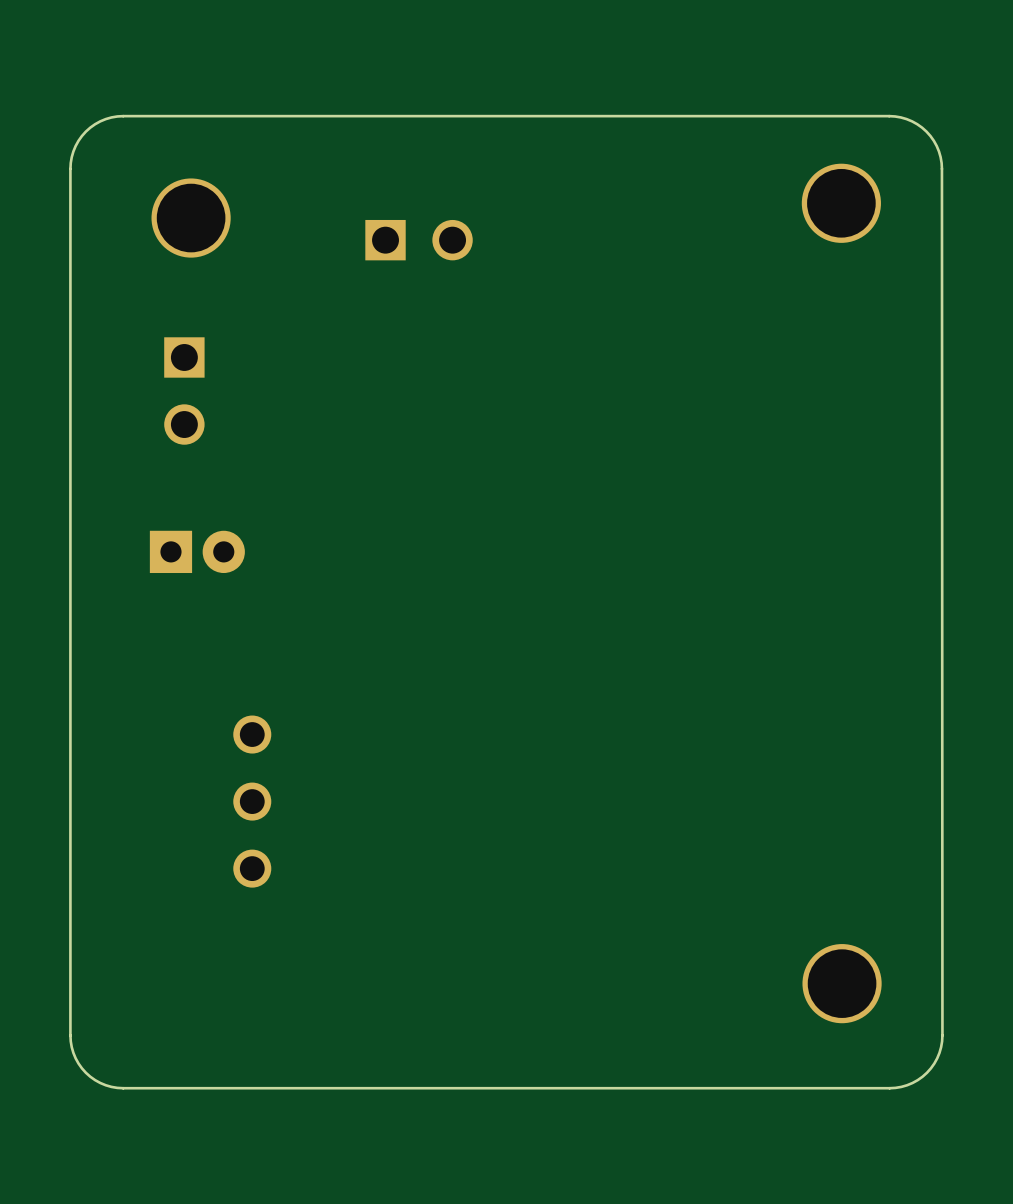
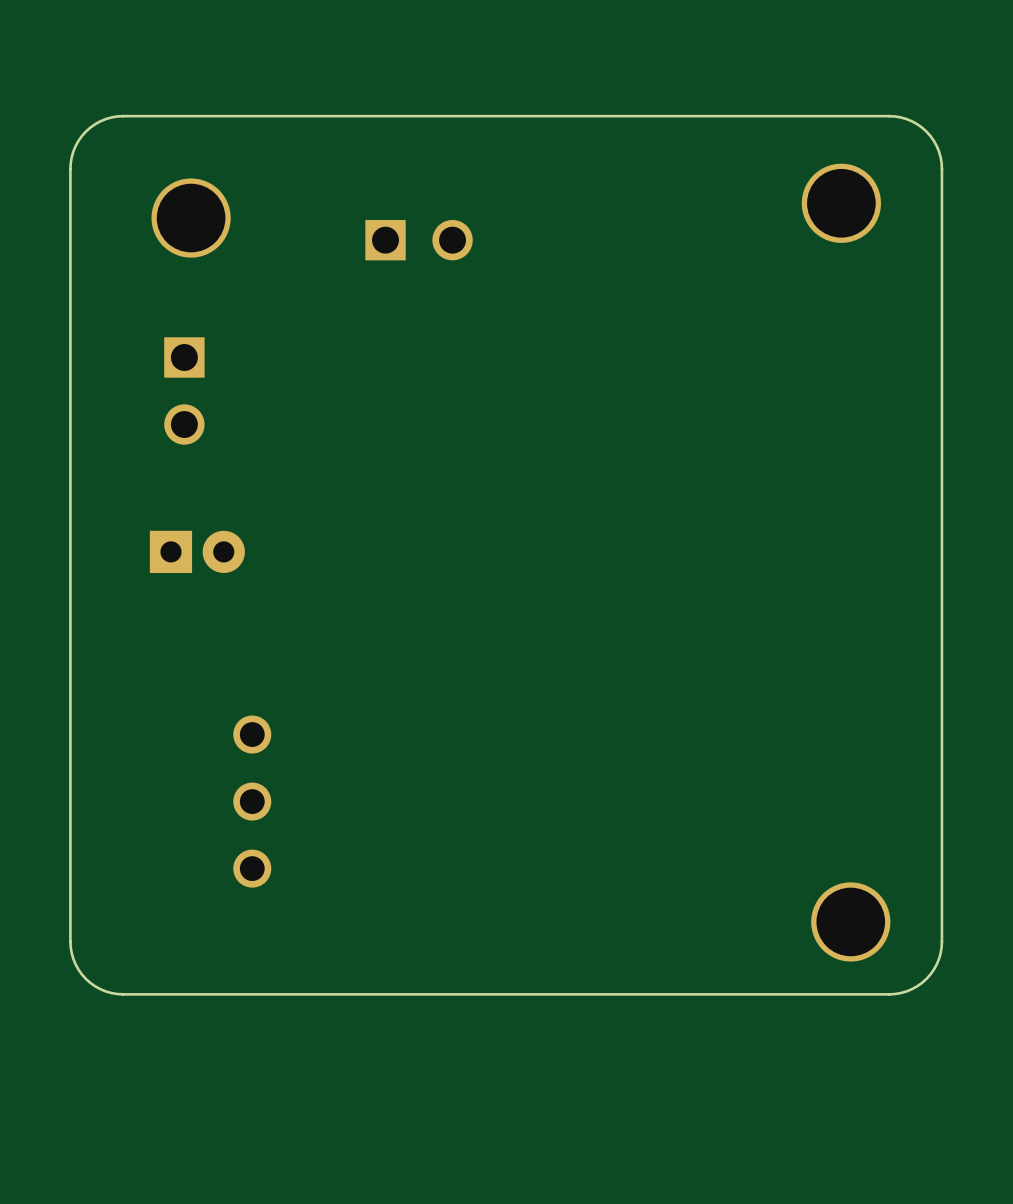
board edge: (941, 168) (942, 1035) (937, 1058) (922, 1076) (907, 1085) (889, 1088) (117, 1087) (105, 1085) (90, 1076) (81, 1068) (73, 1052) (70, 1035) (70, 941) -> (941, 168) (941, 941) (936, 964) (922, 982) (906, 991) (889, 994) (123, 994) (100, 989) (85, 978) (73, 959) (70, 941)
part position: (842, 983) -> (850, 921)

